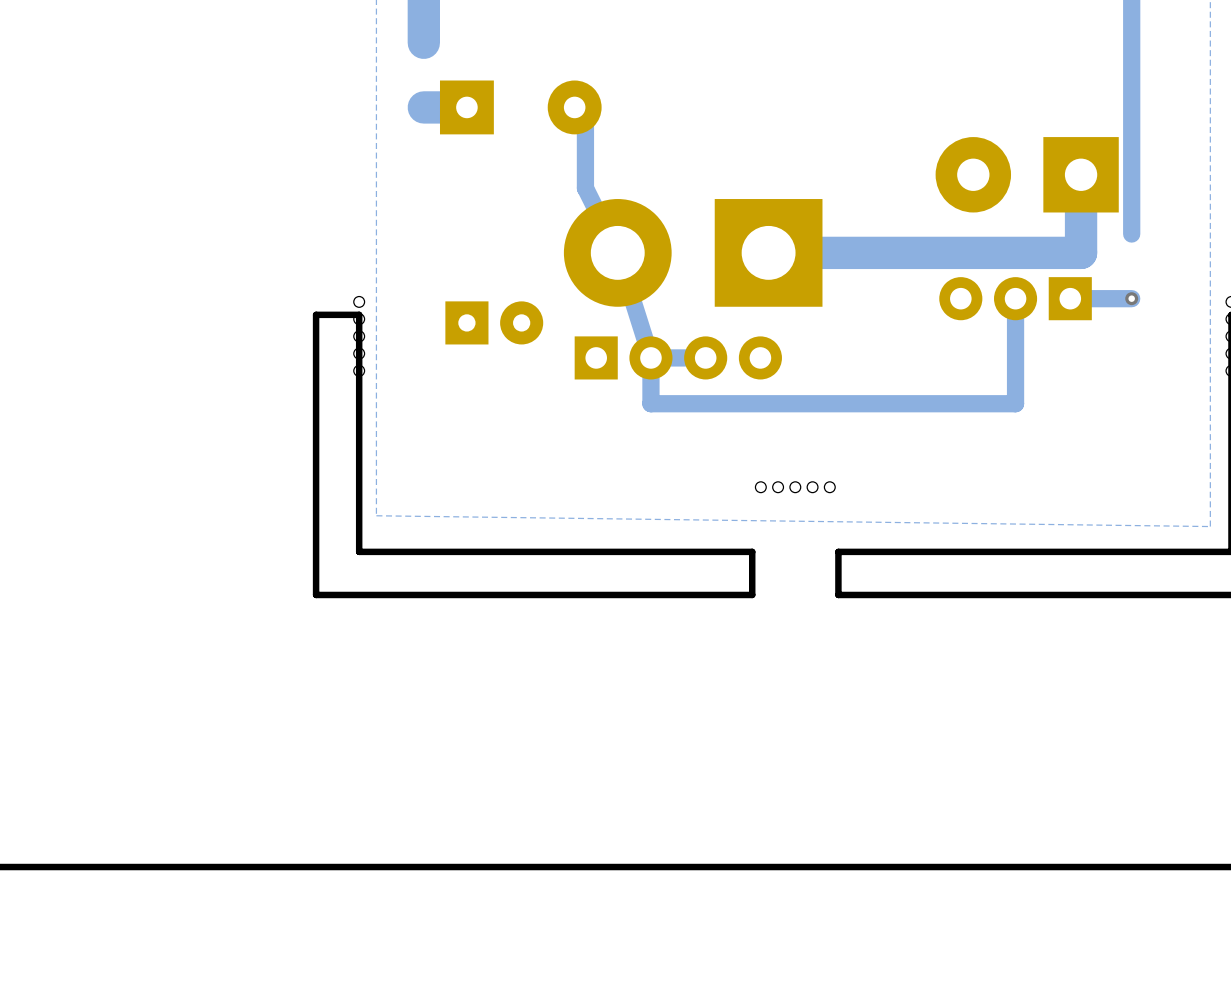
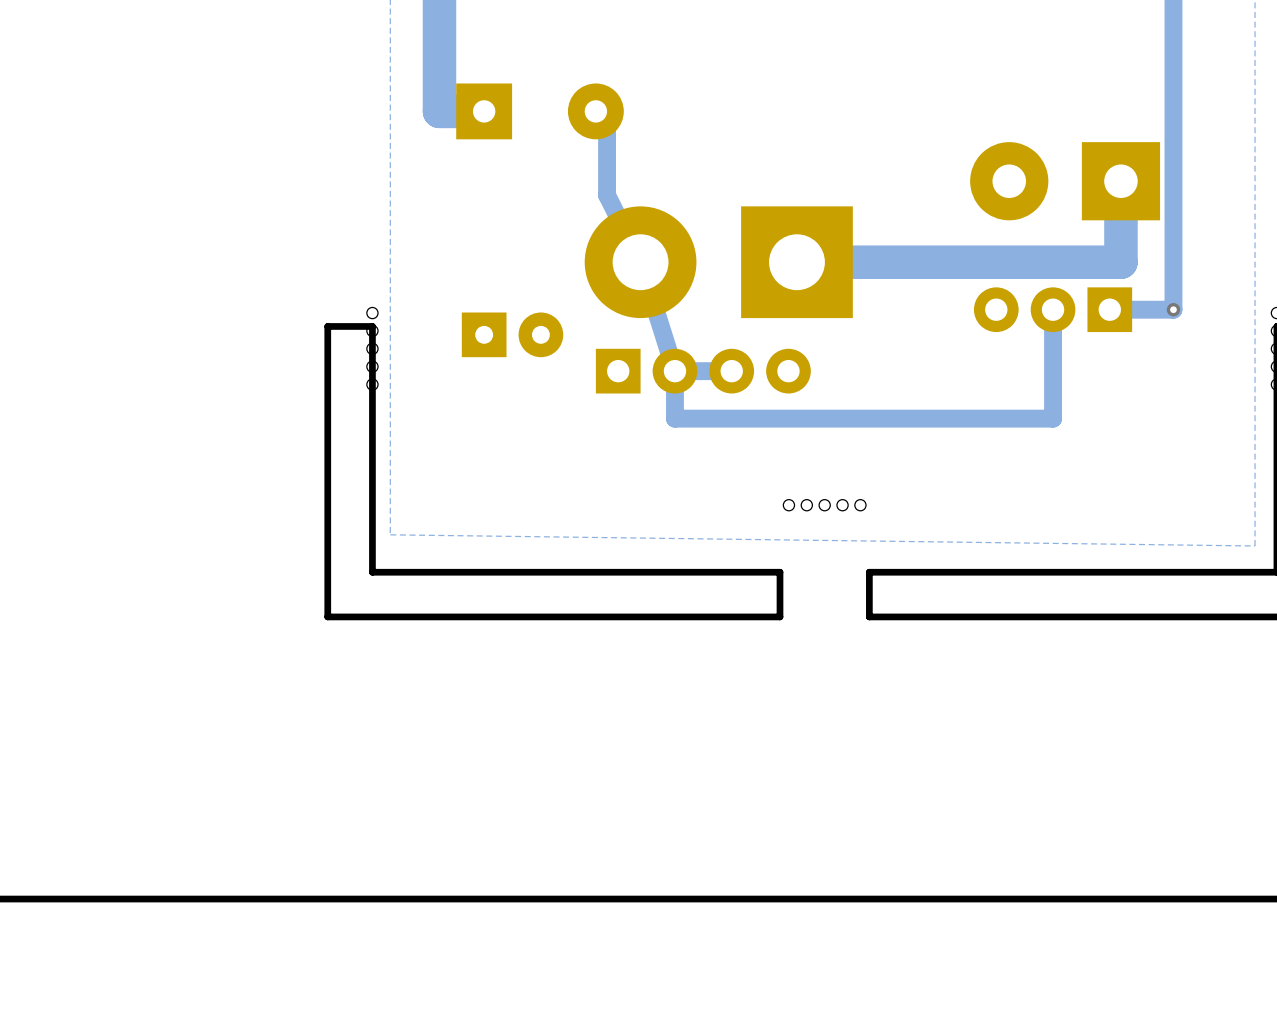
track: none -> (439, 44) (439, 111)
track: none -> (1173, 242) (1173, 309)

